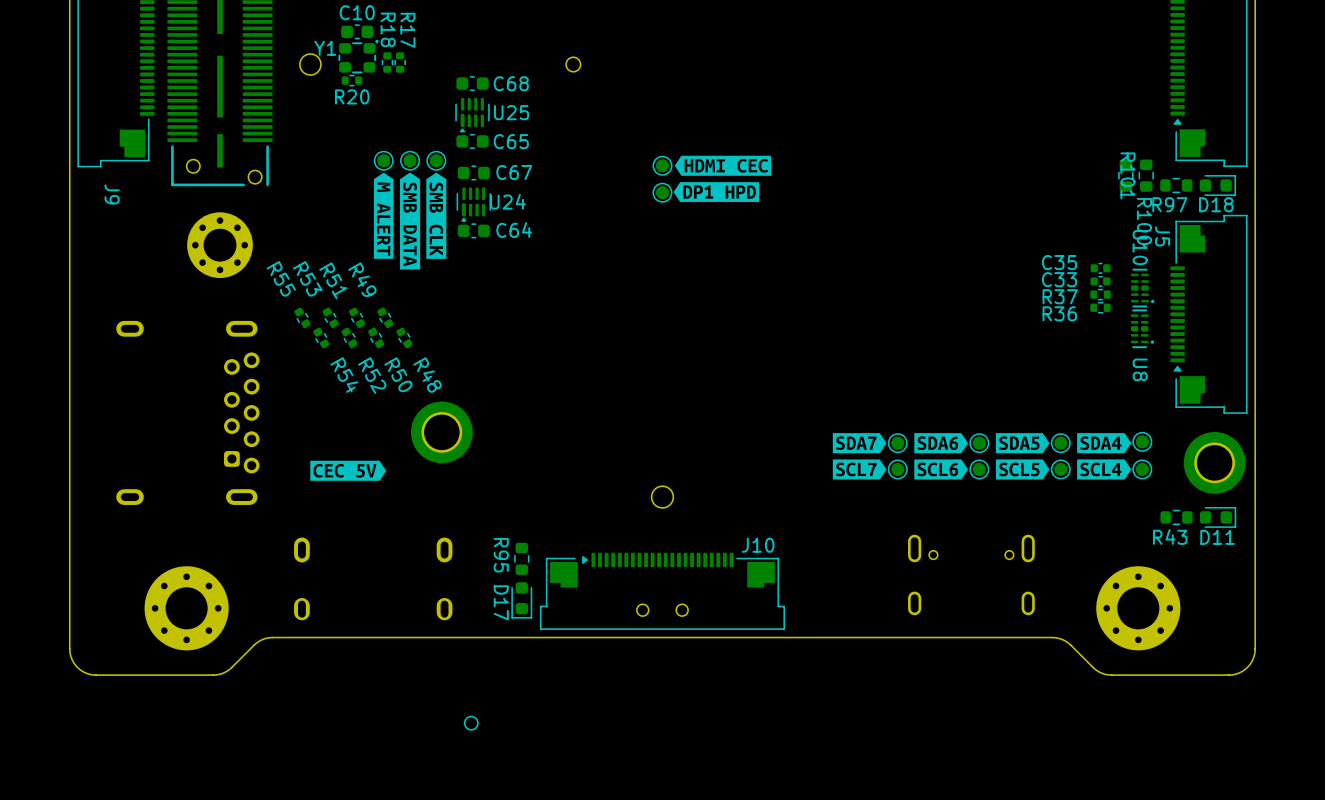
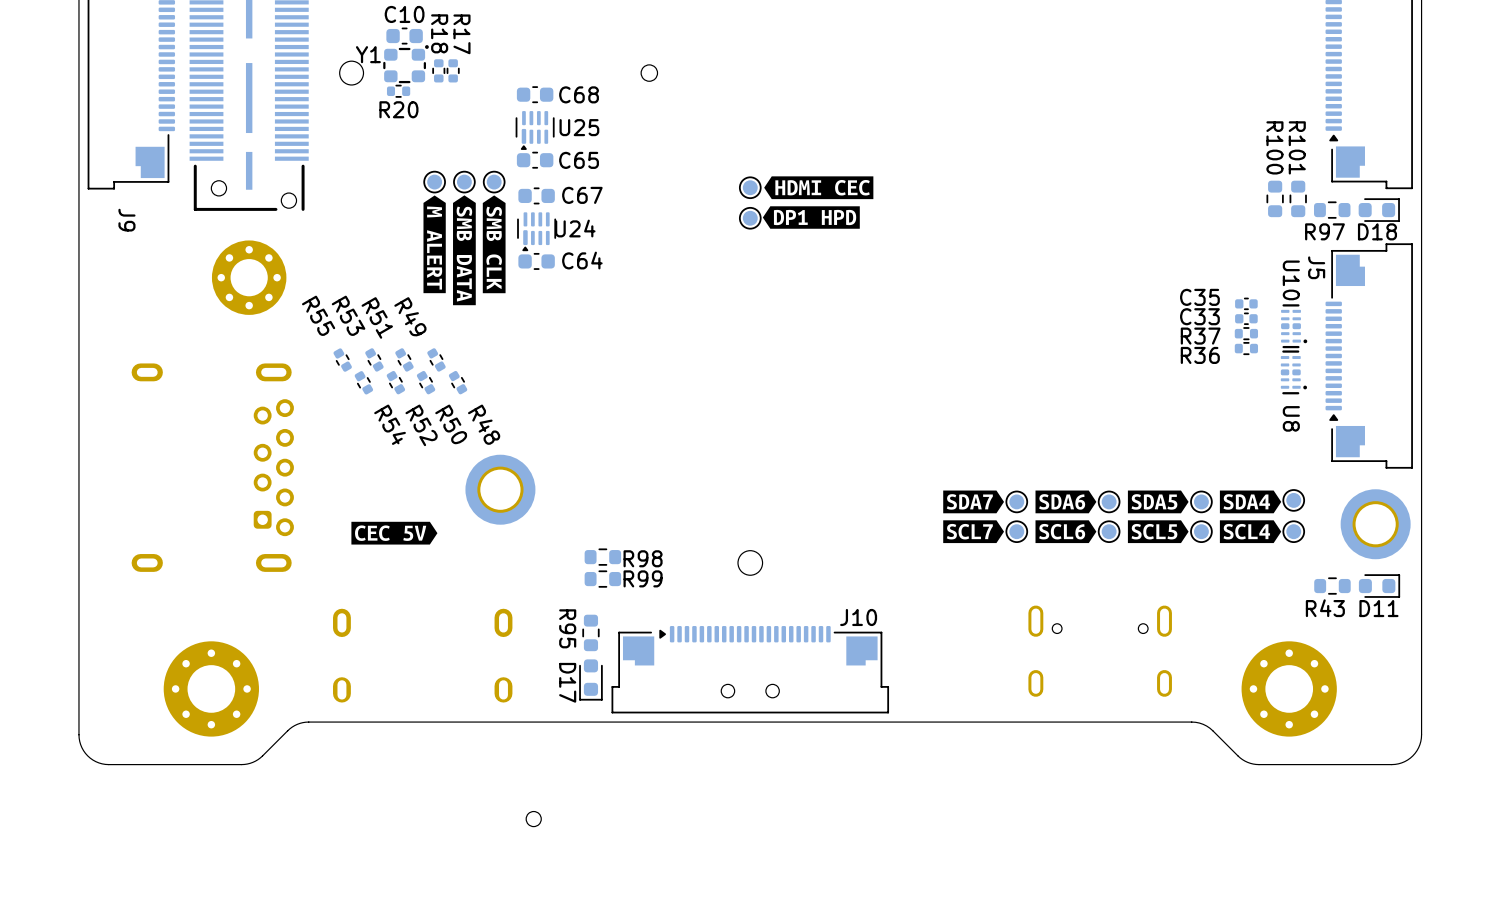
R101 name position: R101 (1127, 175) -> R101 (1297, 147)
R100 name position: R100 (1144, 221) -> R100 (1274, 147)
R98: none -> (602, 557)
R99: none -> (602, 579)

